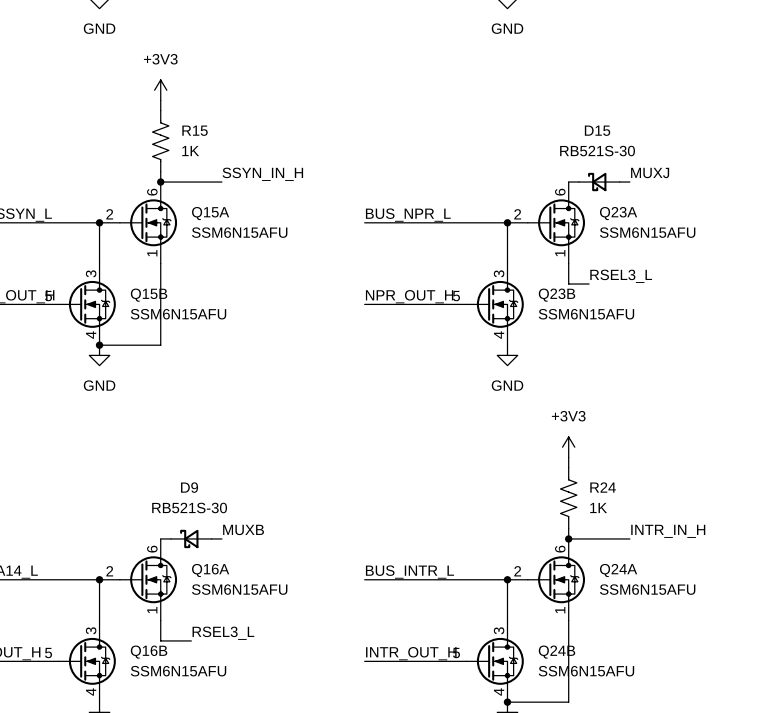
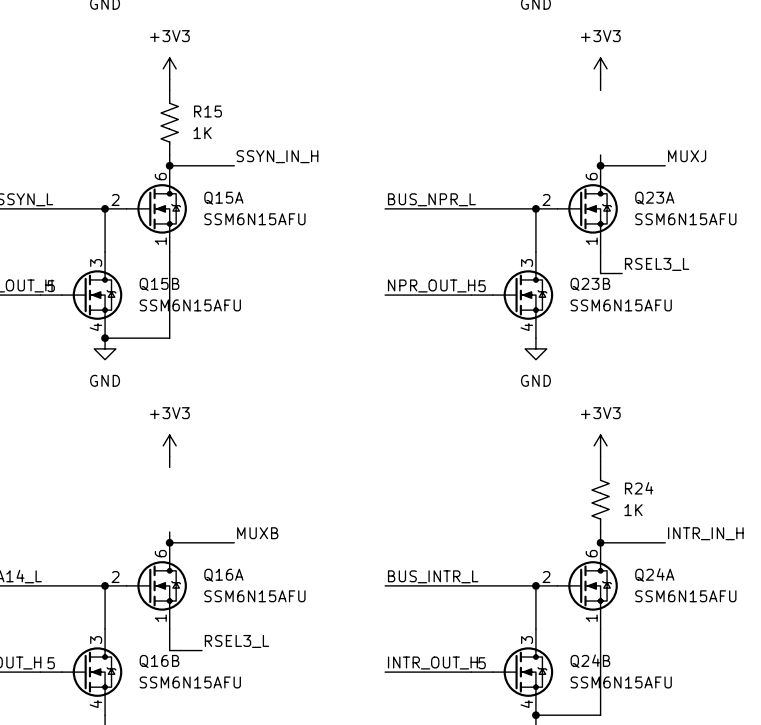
power symbol: none -> +3V3 (600, 68)
wire: none -> (600, 79) (600, 90)
wire: none -> (600, 155) (600, 165)
junction: none -> (600, 165)
D15: RB521S-30 (599, 182) -> none
power symbol: none -> +3V3 (169, 445)
wire: none -> (169, 456) (169, 467)
wire: none -> (169, 532) (169, 542)
junction: none -> (169, 542)
D9: RB521S-30 (191, 538) -> none

